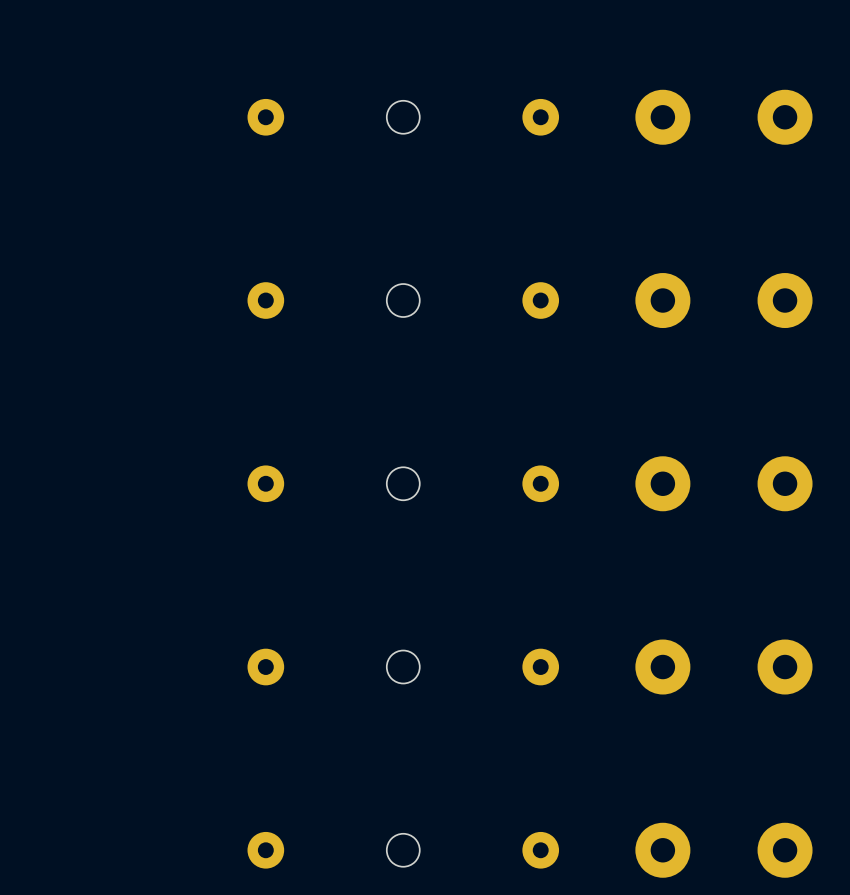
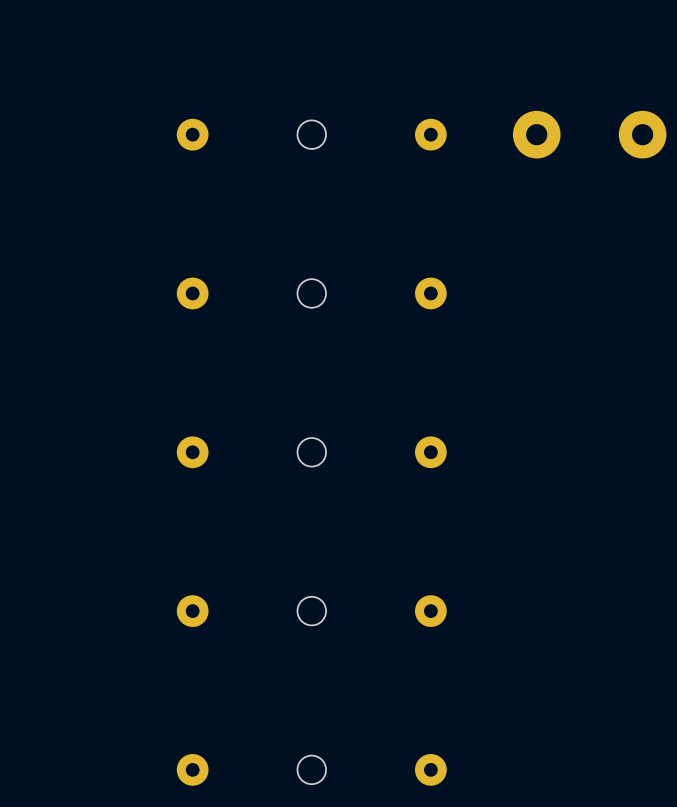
part: (662, 300) -> none
part: (785, 300) -> none
part: (662, 483) -> none
part: (785, 483) -> none
part: (662, 667) -> none
part: (785, 667) -> none
part: (662, 850) -> none
part: (785, 850) -> none

